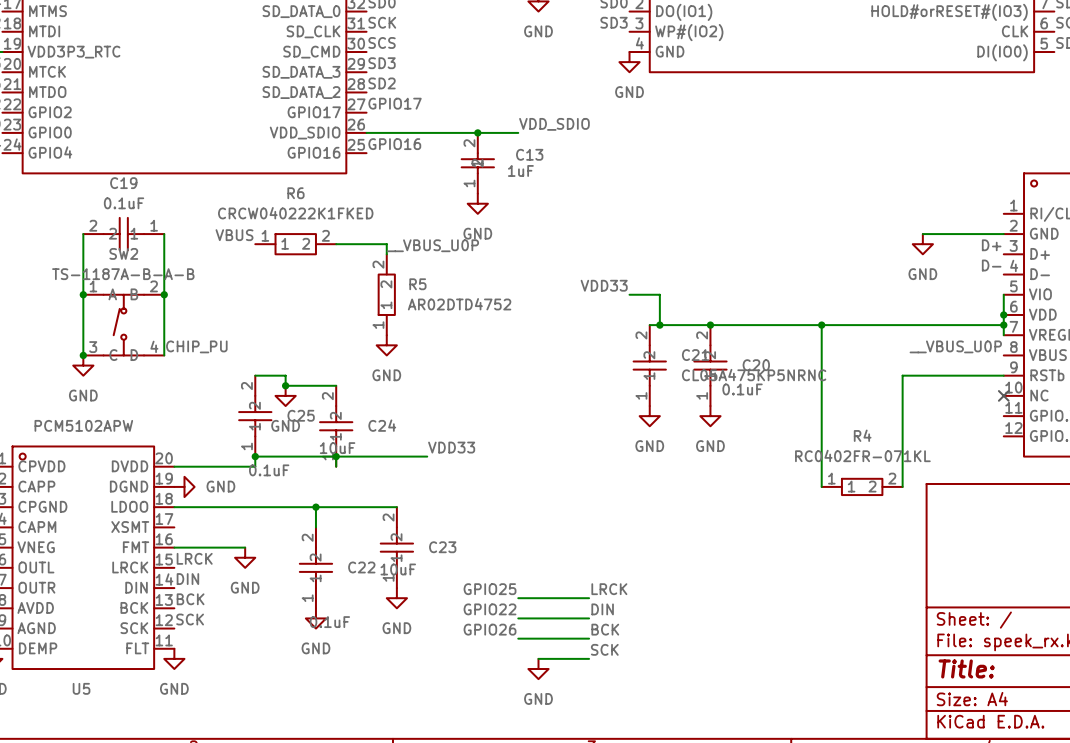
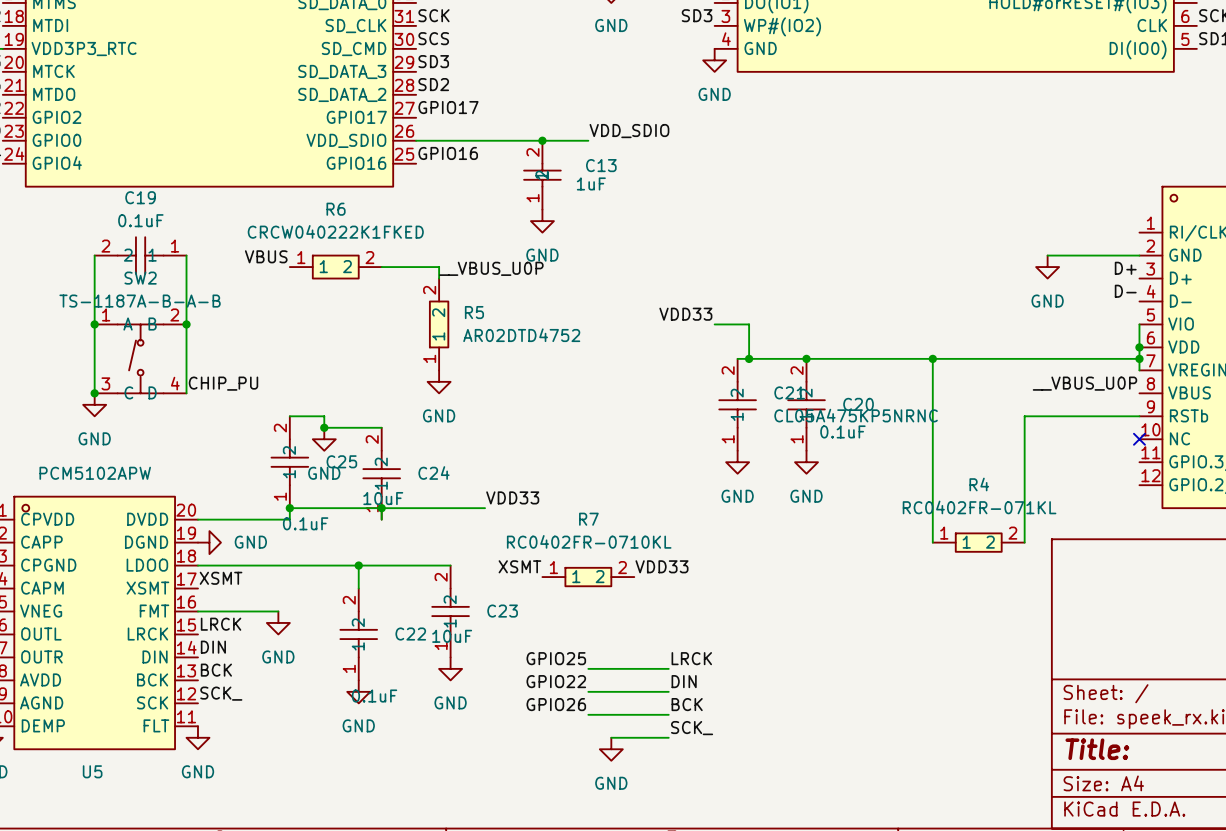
label: none -> XSMT (519, 566)
label: none -> VDD33 (661, 566)
R7: none -> RC0402FR-0710KL (588, 577)
label: none -> XSMT (221, 578)
label: SCK (190, 619) -> SCK_ (221, 693)
label: SCK (604, 649) -> SCK_ (692, 728)

